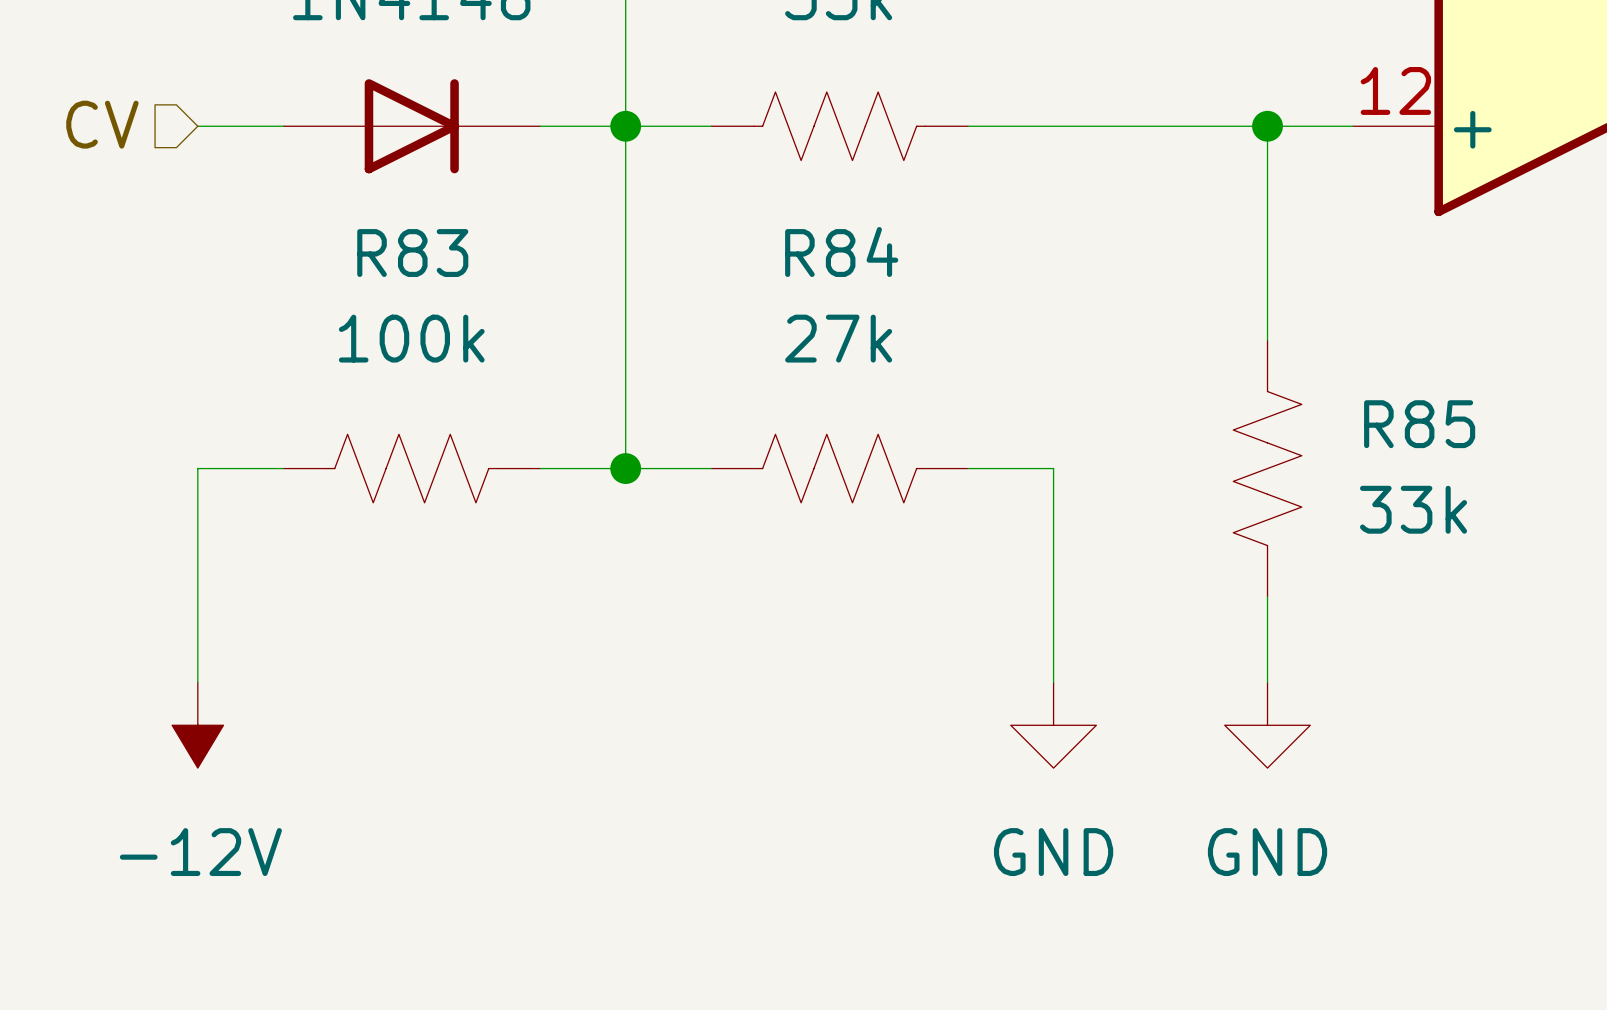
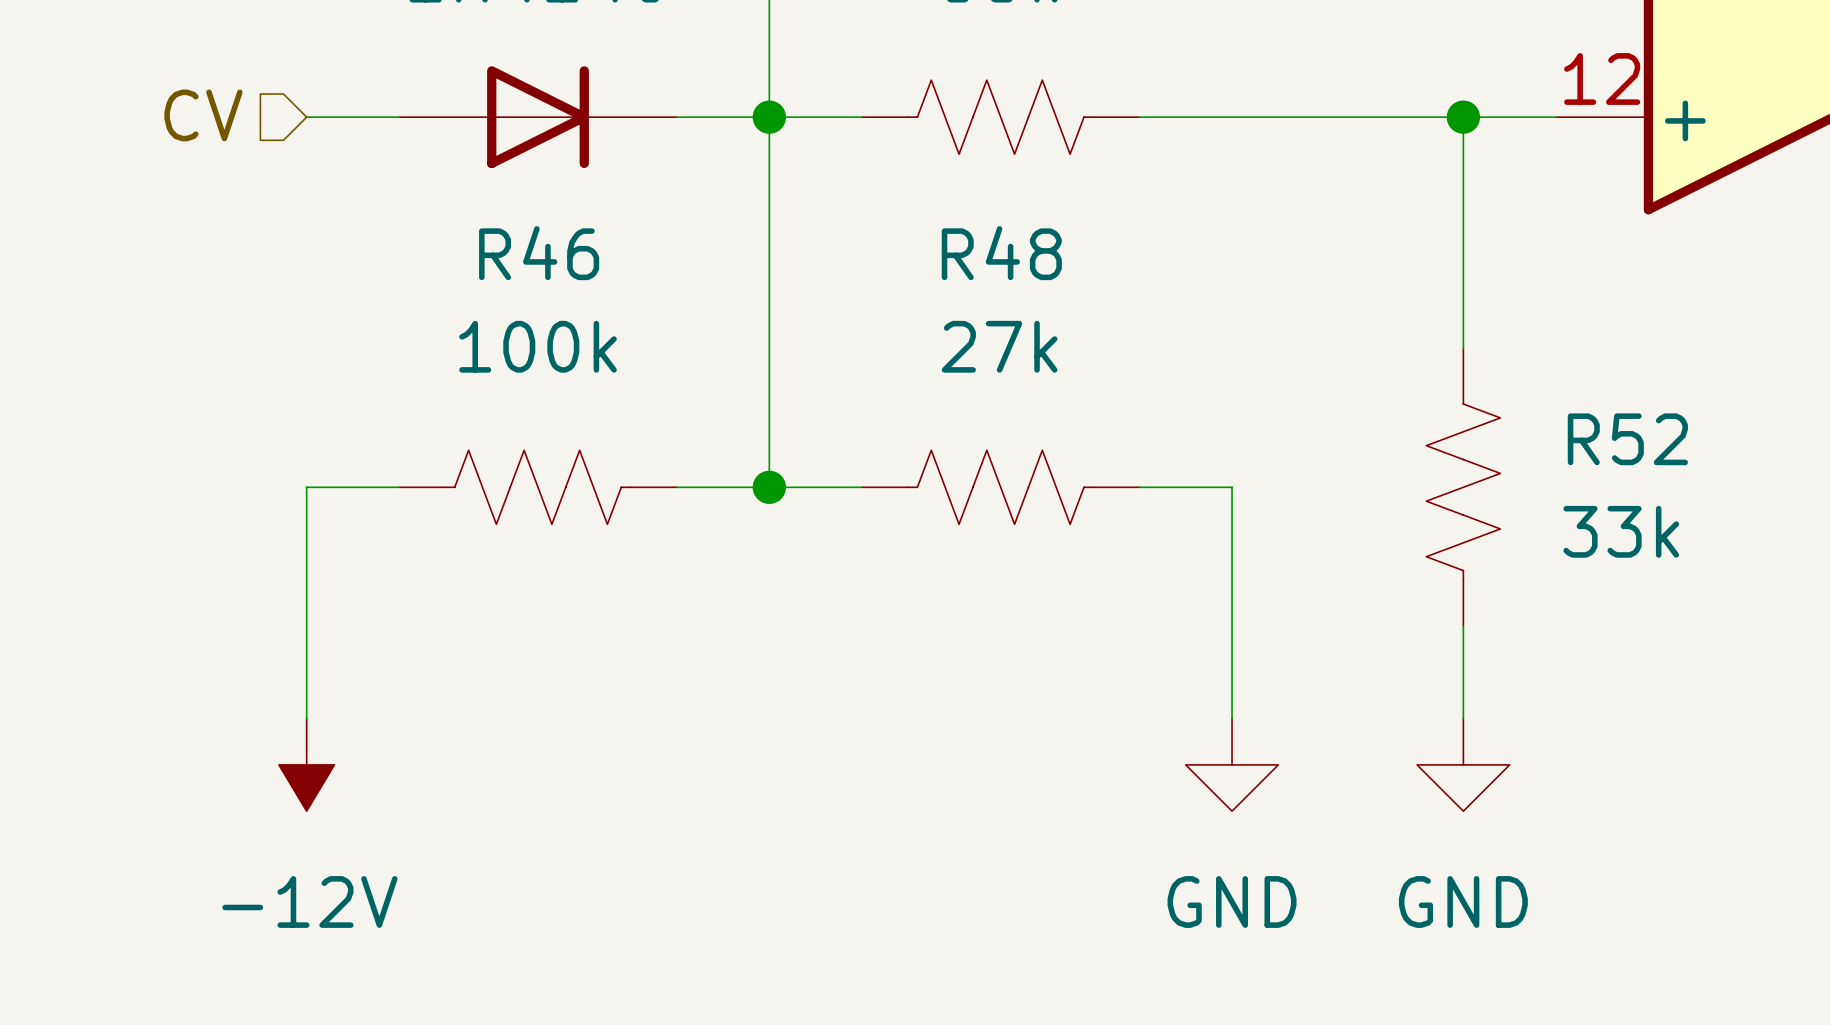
R84 name: R84 (841, 252) -> R48 (1001, 253)
R83 name: R83 (412, 253) -> R46 (539, 253)
R85 name: R85 (1419, 424) -> R52 (1627, 439)

